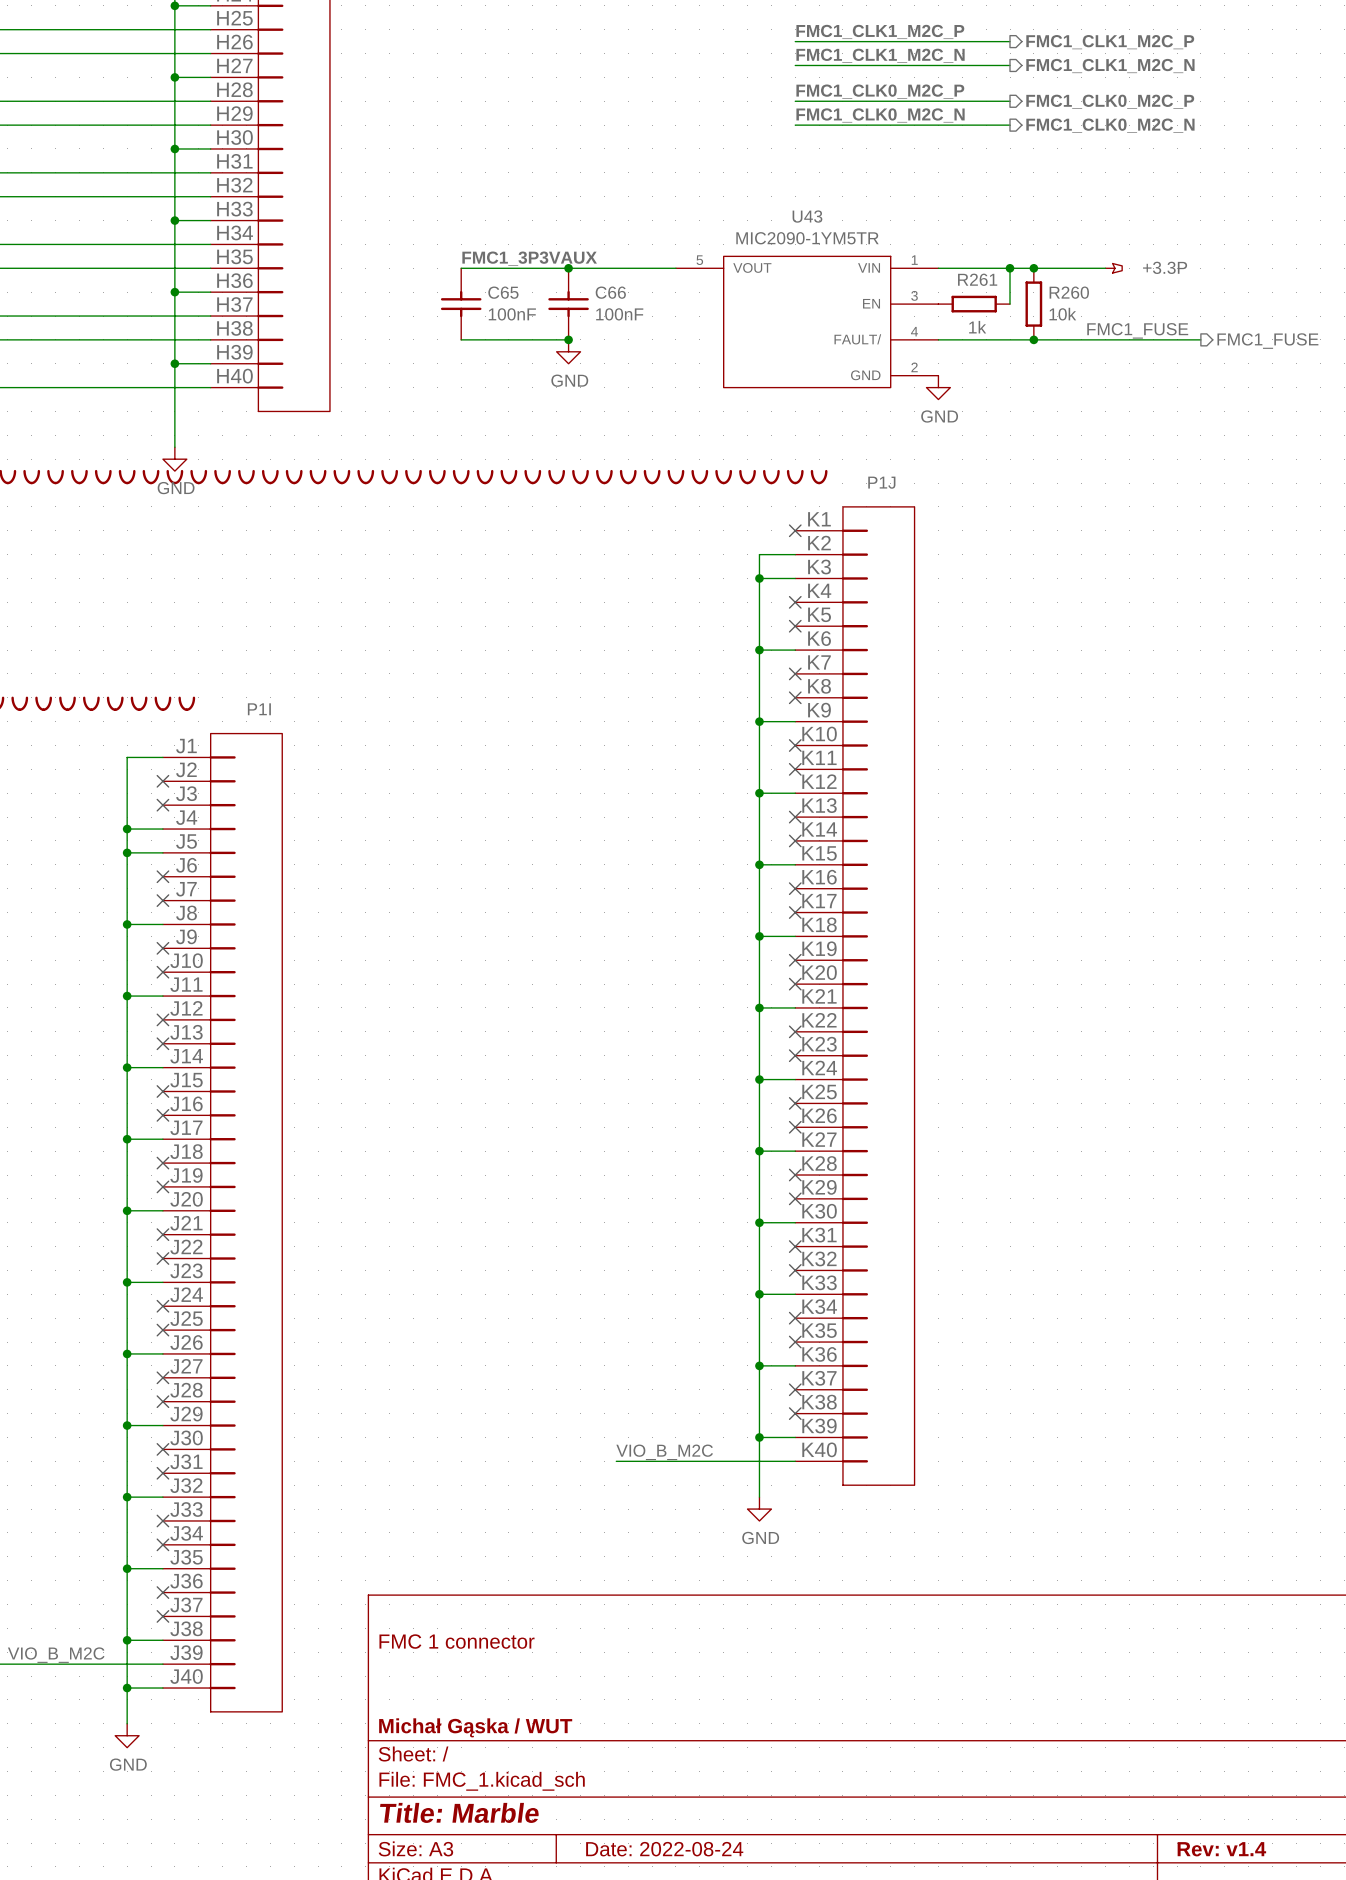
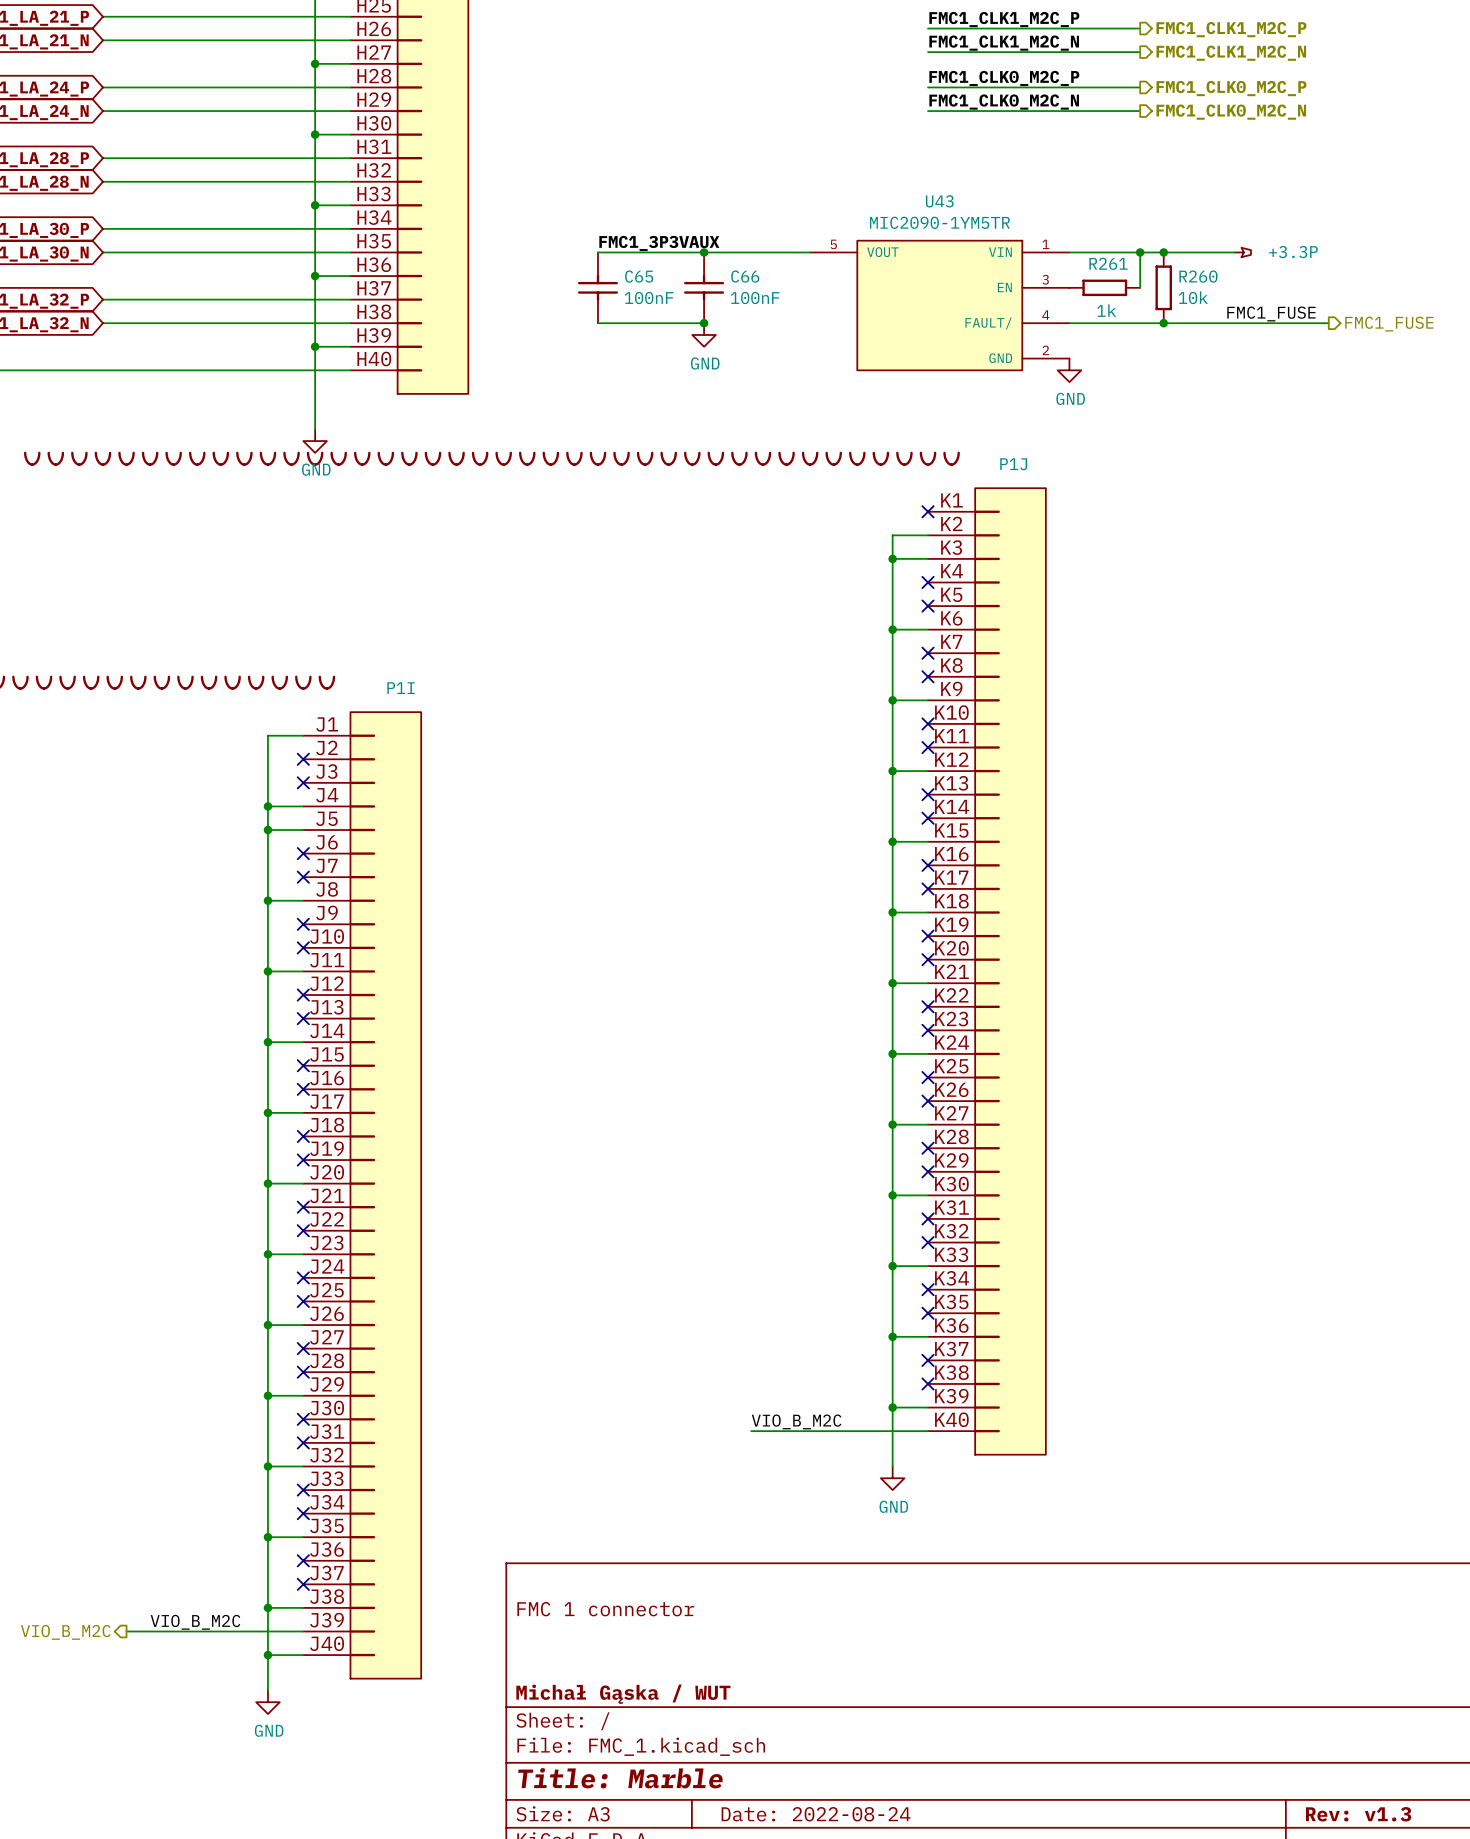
title block: Rev: v1.4 (1221, 1849) -> Rev: v1.3 (1358, 1814)

